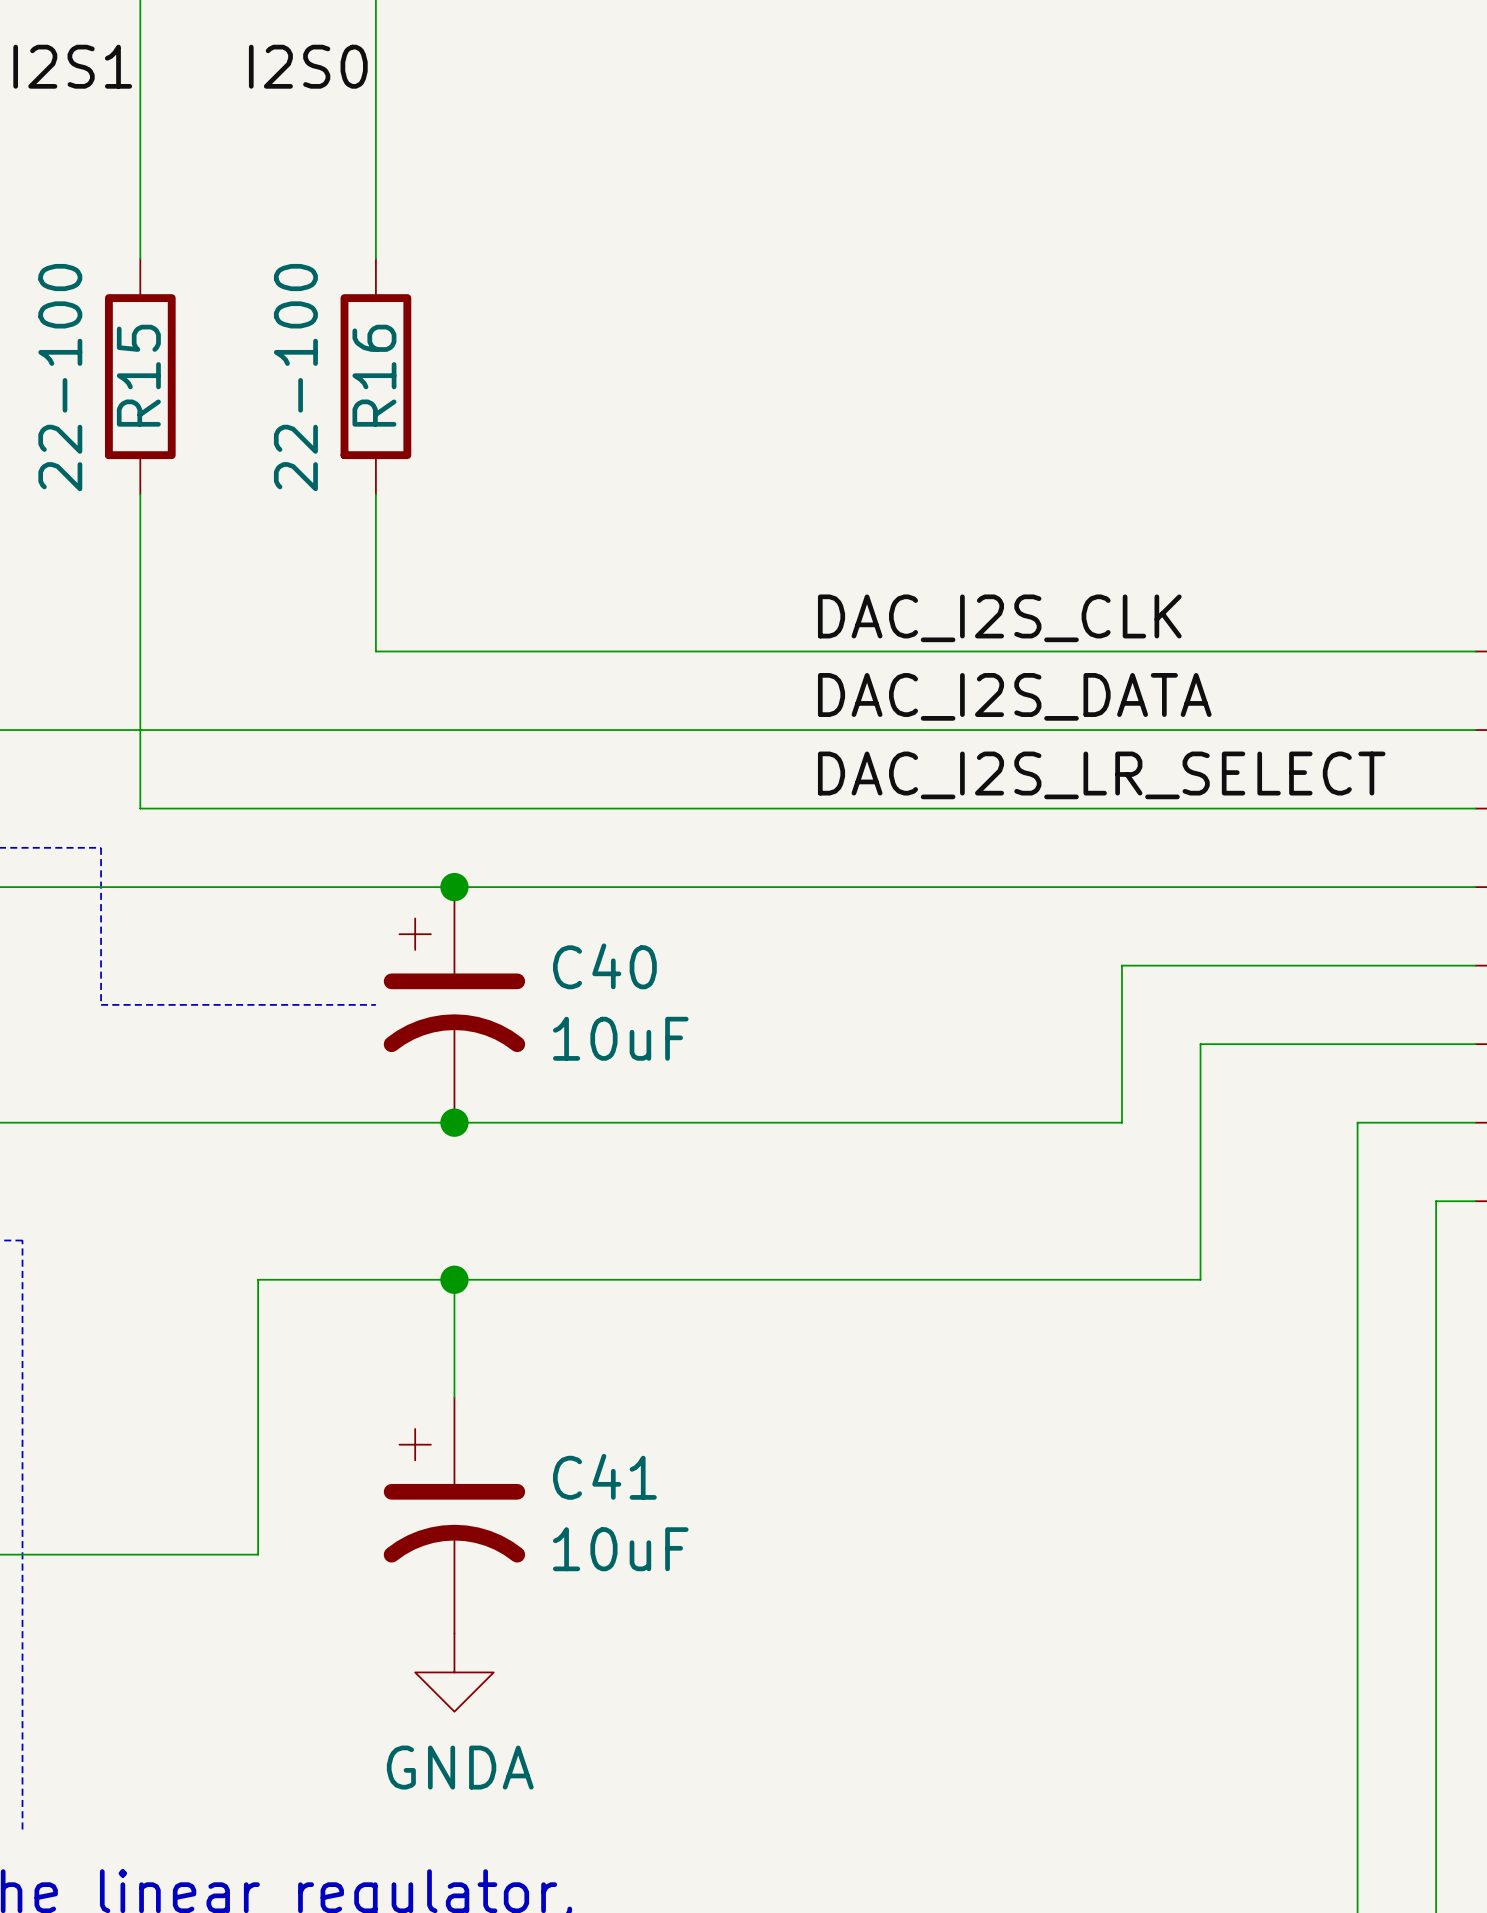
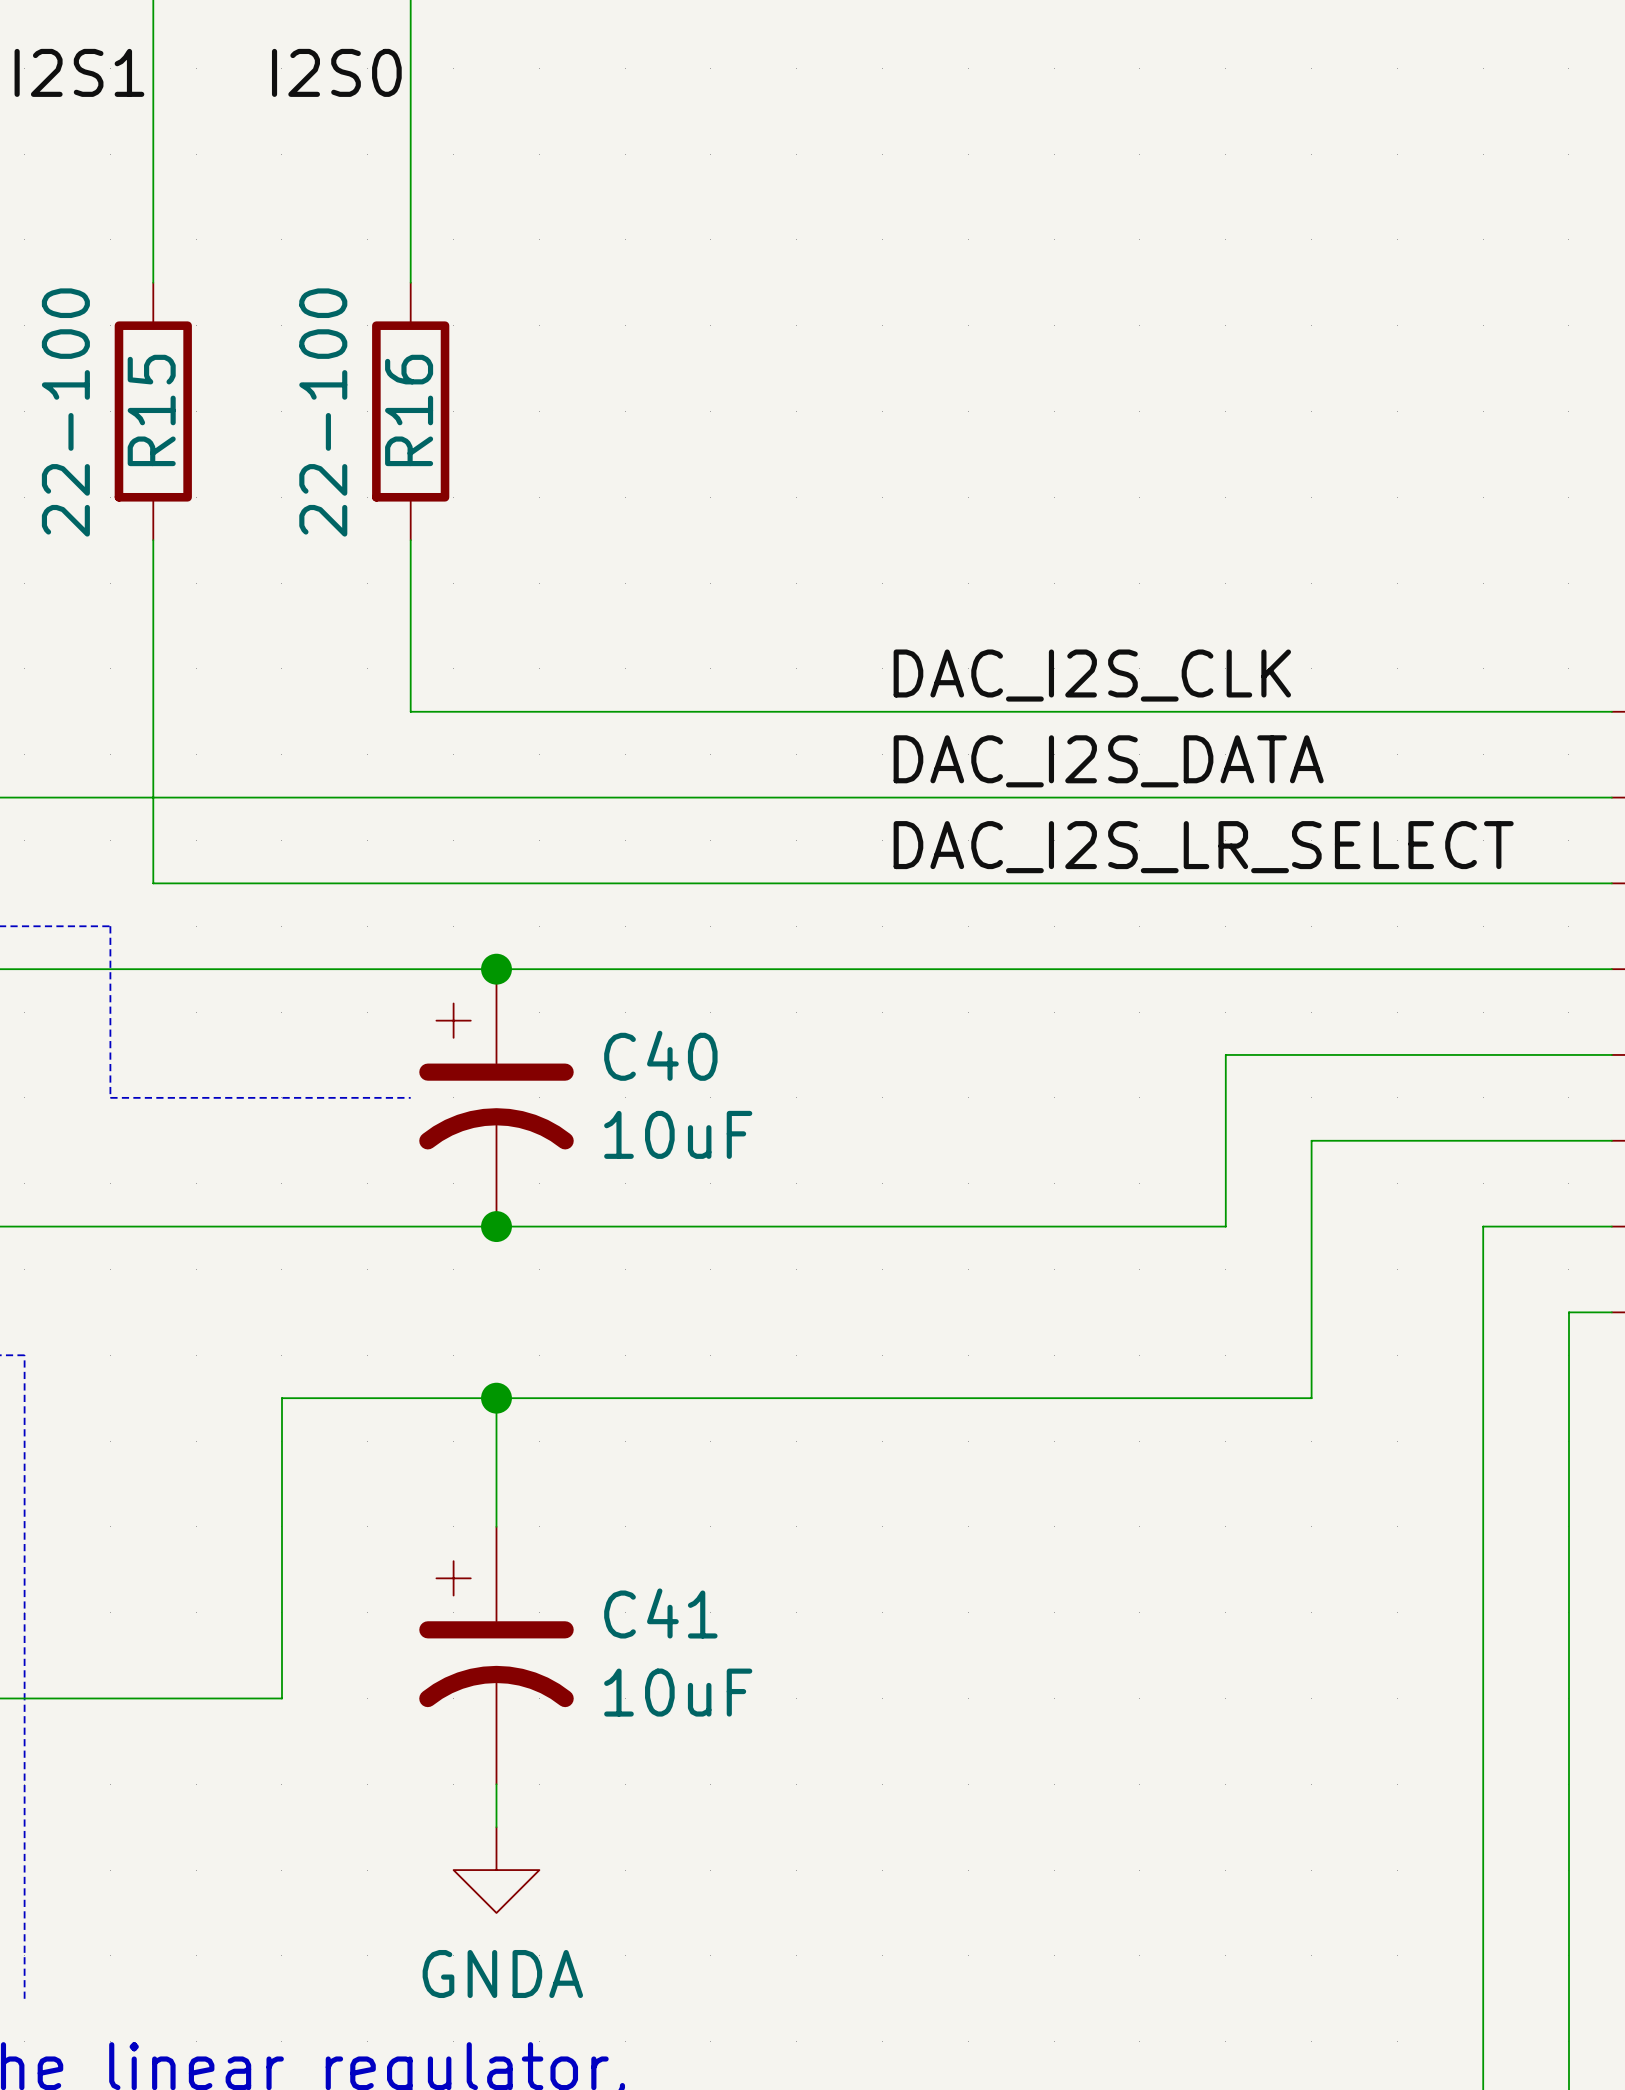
power symbol position: GNDA (454, 1672) -> GNDA (496, 1870)

